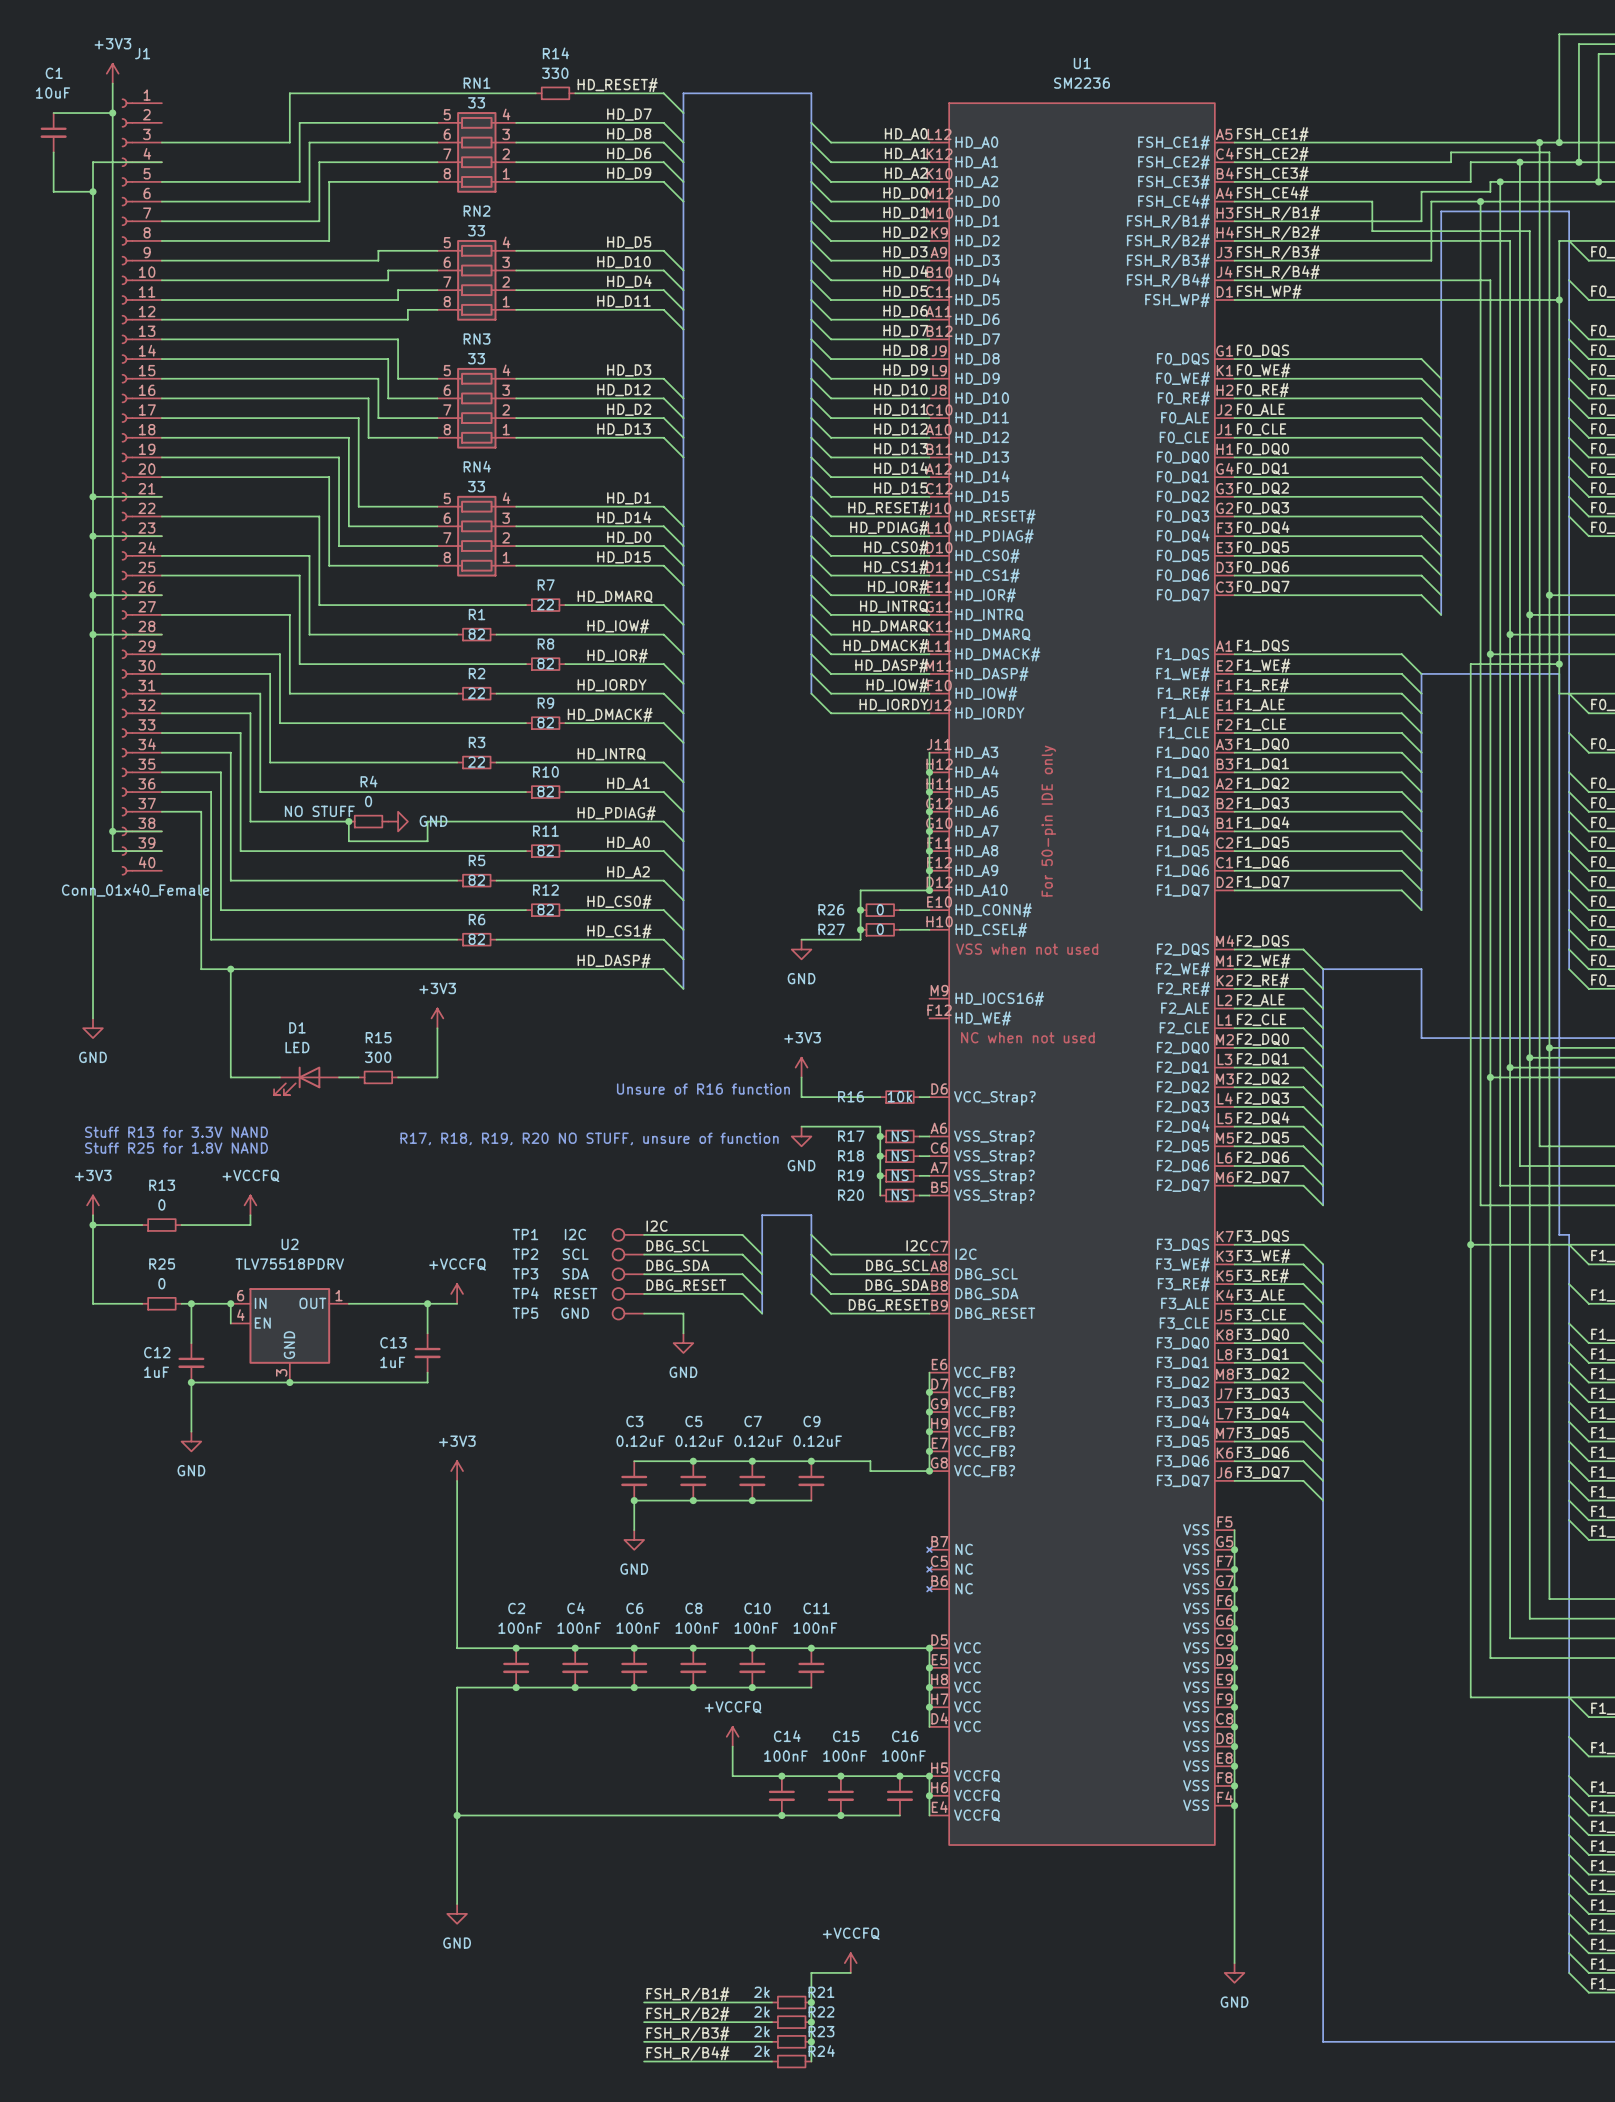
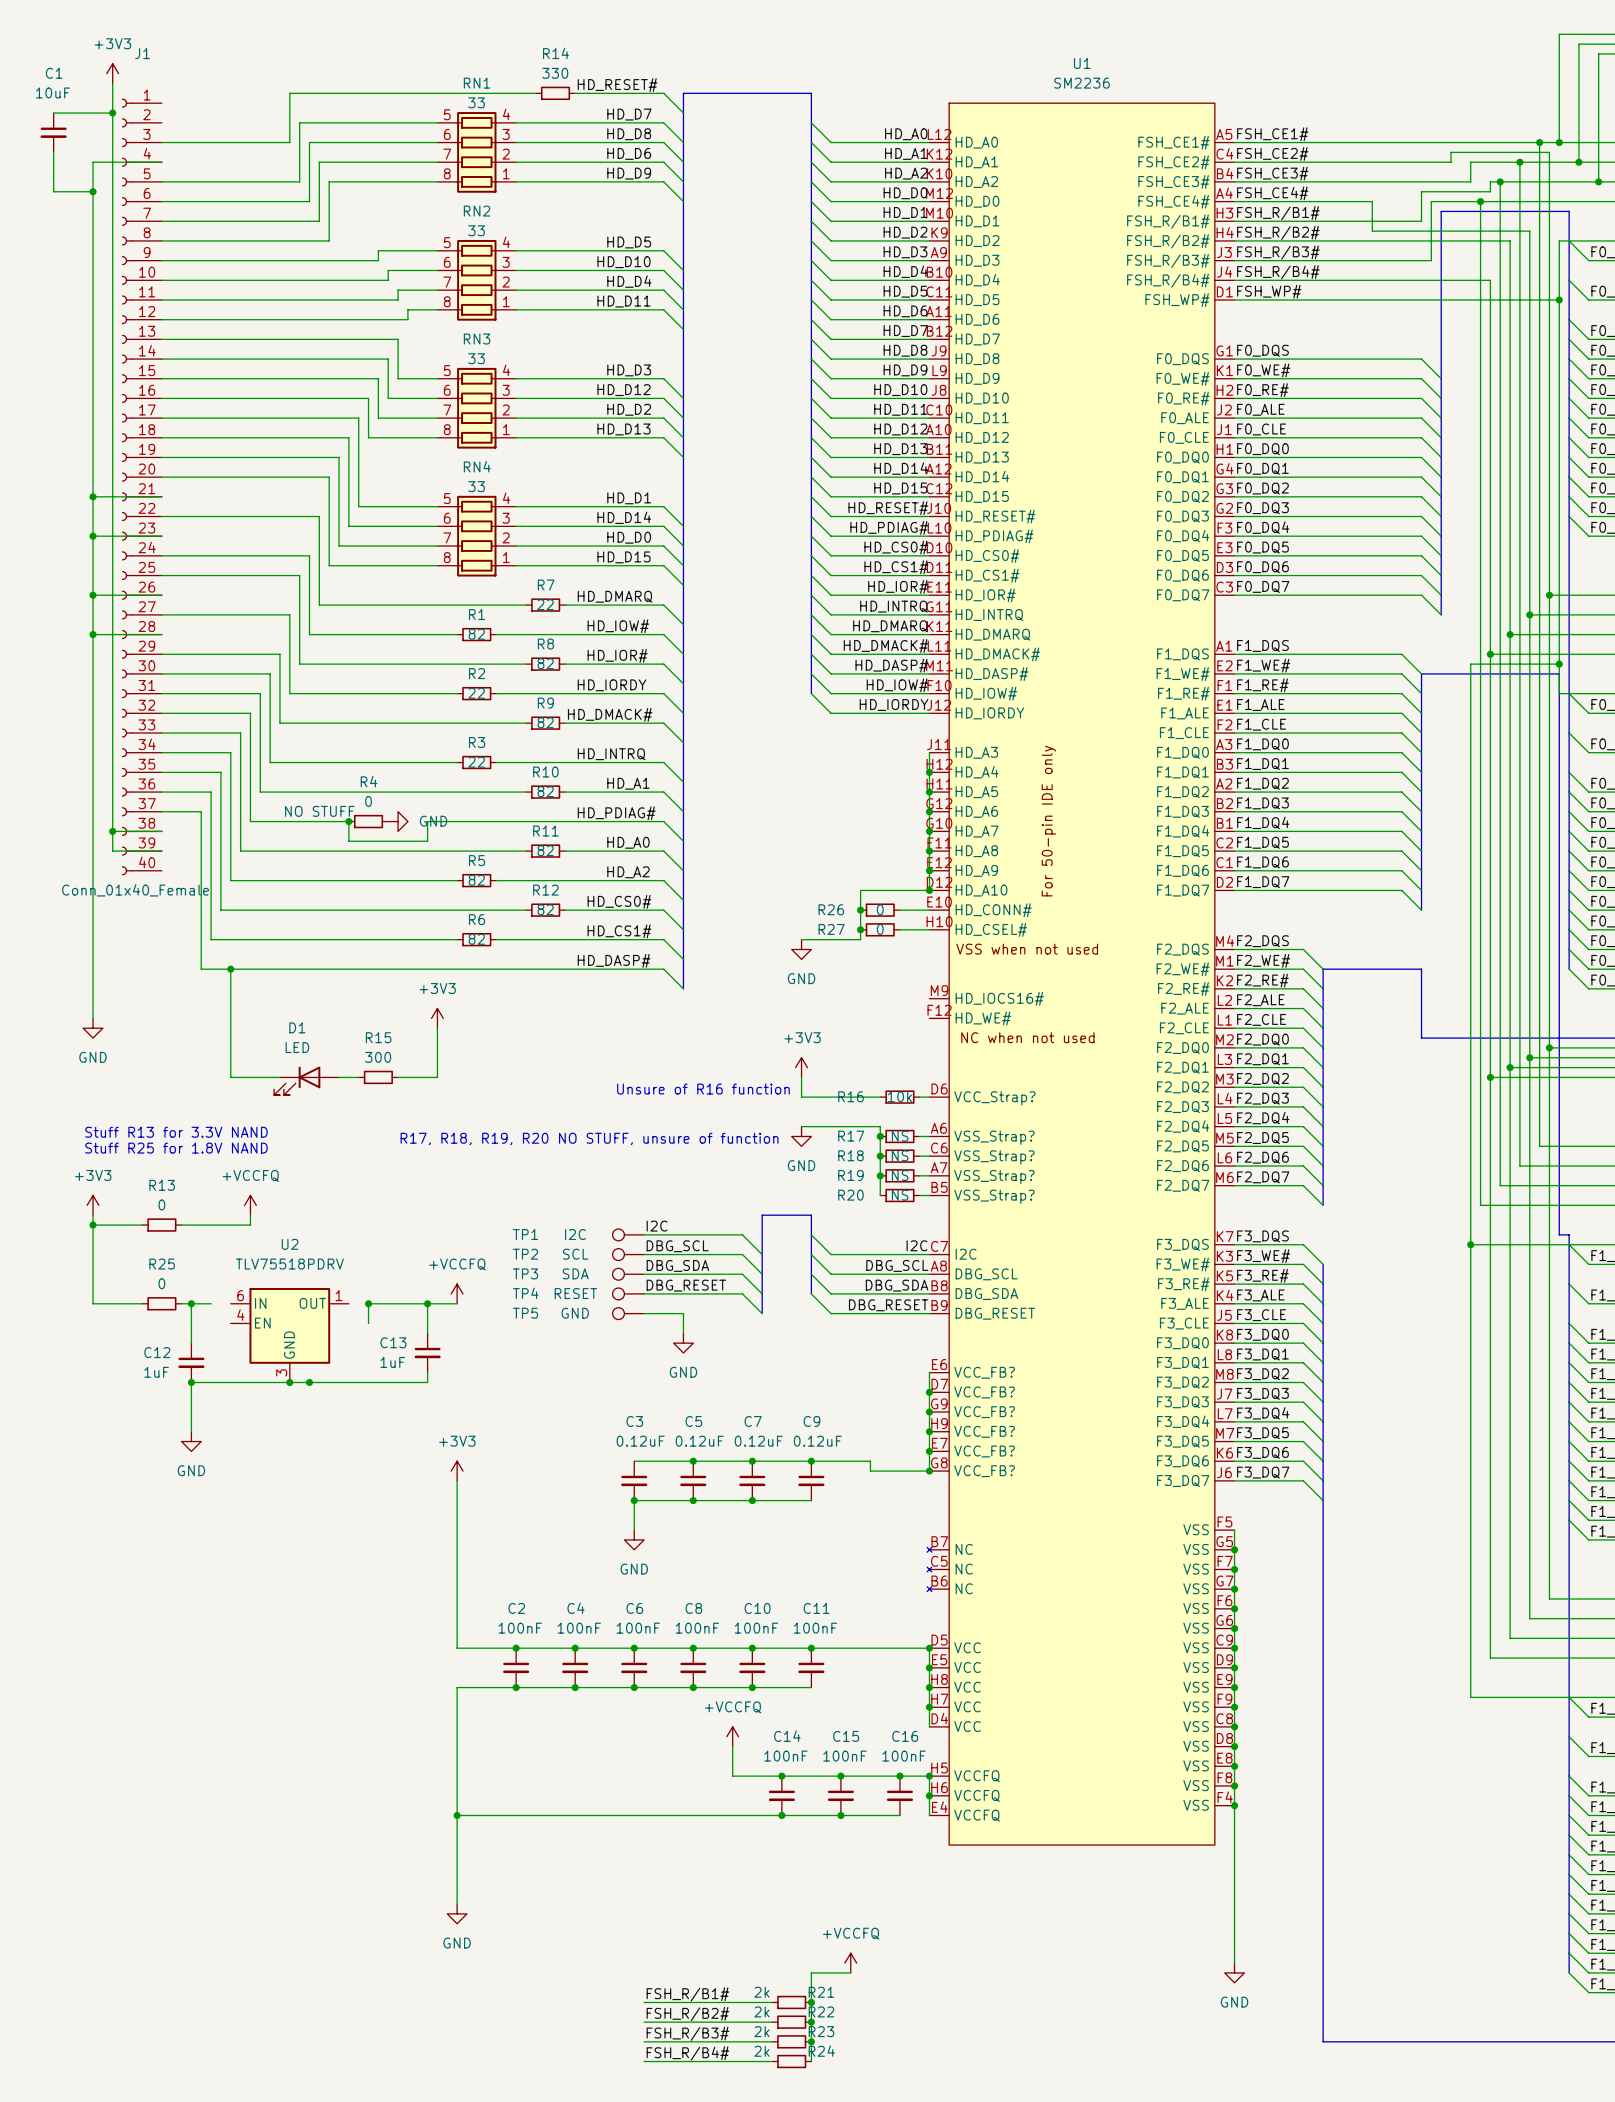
wire: (211, 1303) (230, 1303) (230, 1323) -> none
junction: (230, 1303) -> none
wire: (348, 1303) (368, 1303) -> (368, 1323) (368, 1303)
junction: none -> (368, 1303)
junction: none -> (309, 1382)

